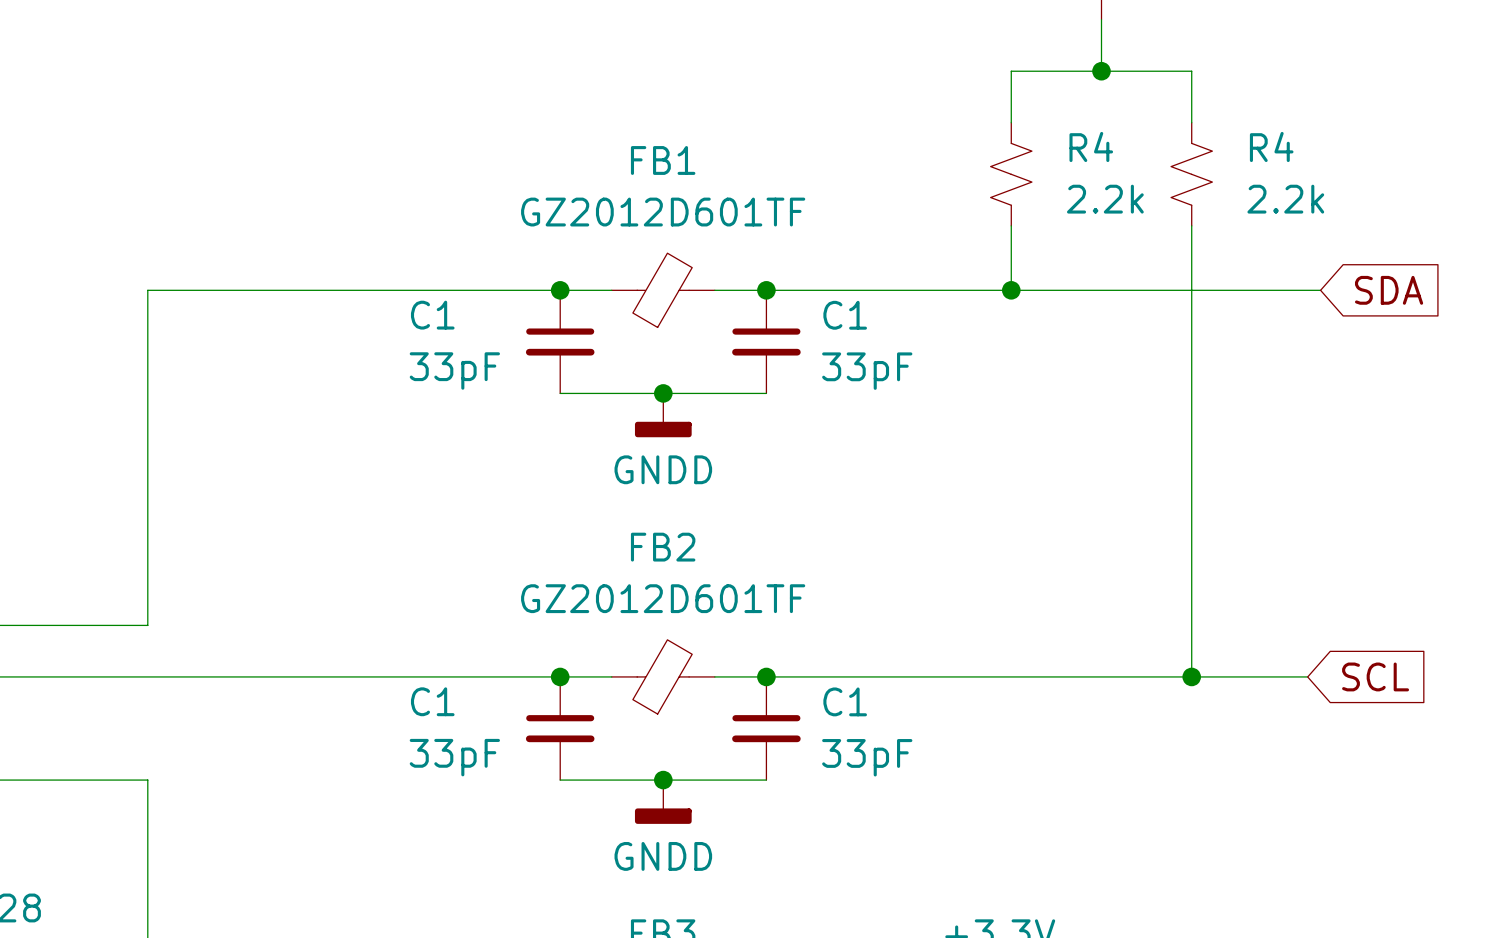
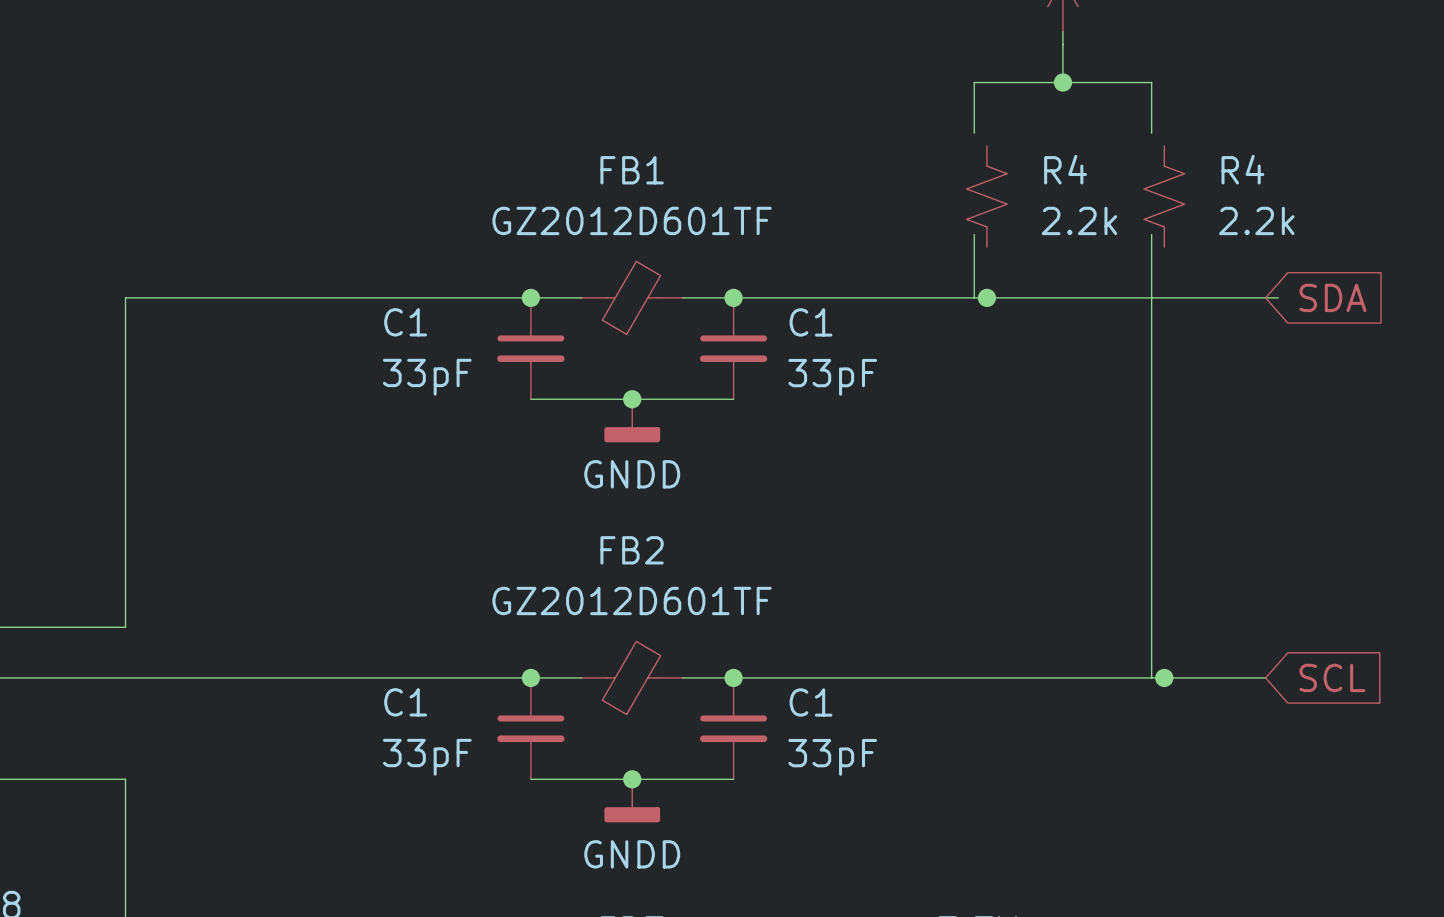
R4 position: (1011, 174) -> (986, 196)
R4 position: (1191, 174) -> (1164, 196)
junction position: (1011, 290) -> (986, 297)
global label position: SDA (1389, 290) -> SDA (1332, 297)
junction position: (1191, 676) -> (1164, 677)

